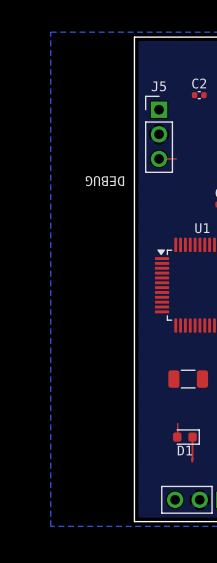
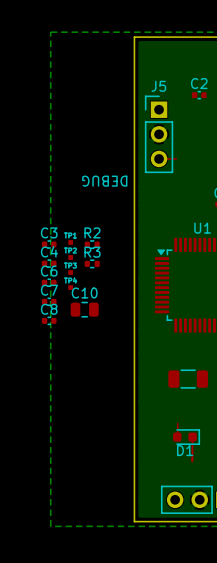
part: none -> (70, 242)
C3: none -> (49, 244)
R2: none -> (92, 244)
part: none -> (70, 257)
C4: none -> (49, 263)
R3: none -> (92, 263)
part: none -> (70, 272)
C6: none -> (49, 282)
part: none -> (70, 287)
C7: none -> (49, 301)
C10: none -> (84, 309)
C8: none -> (49, 320)

